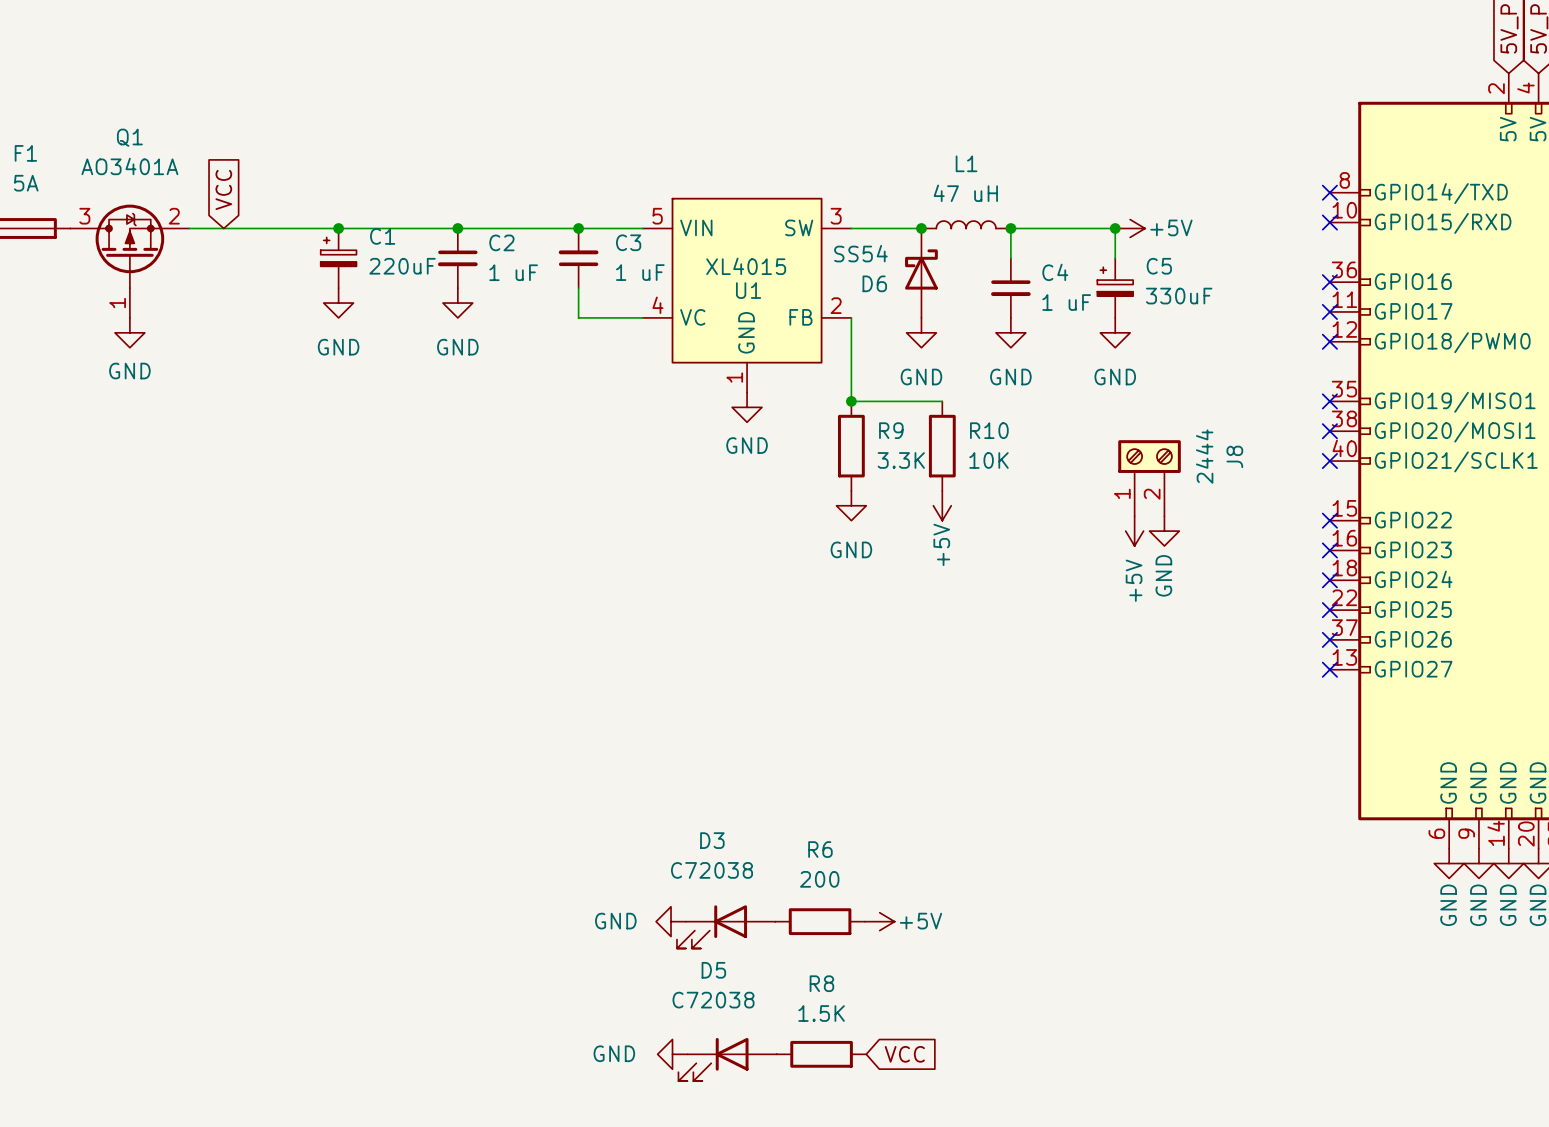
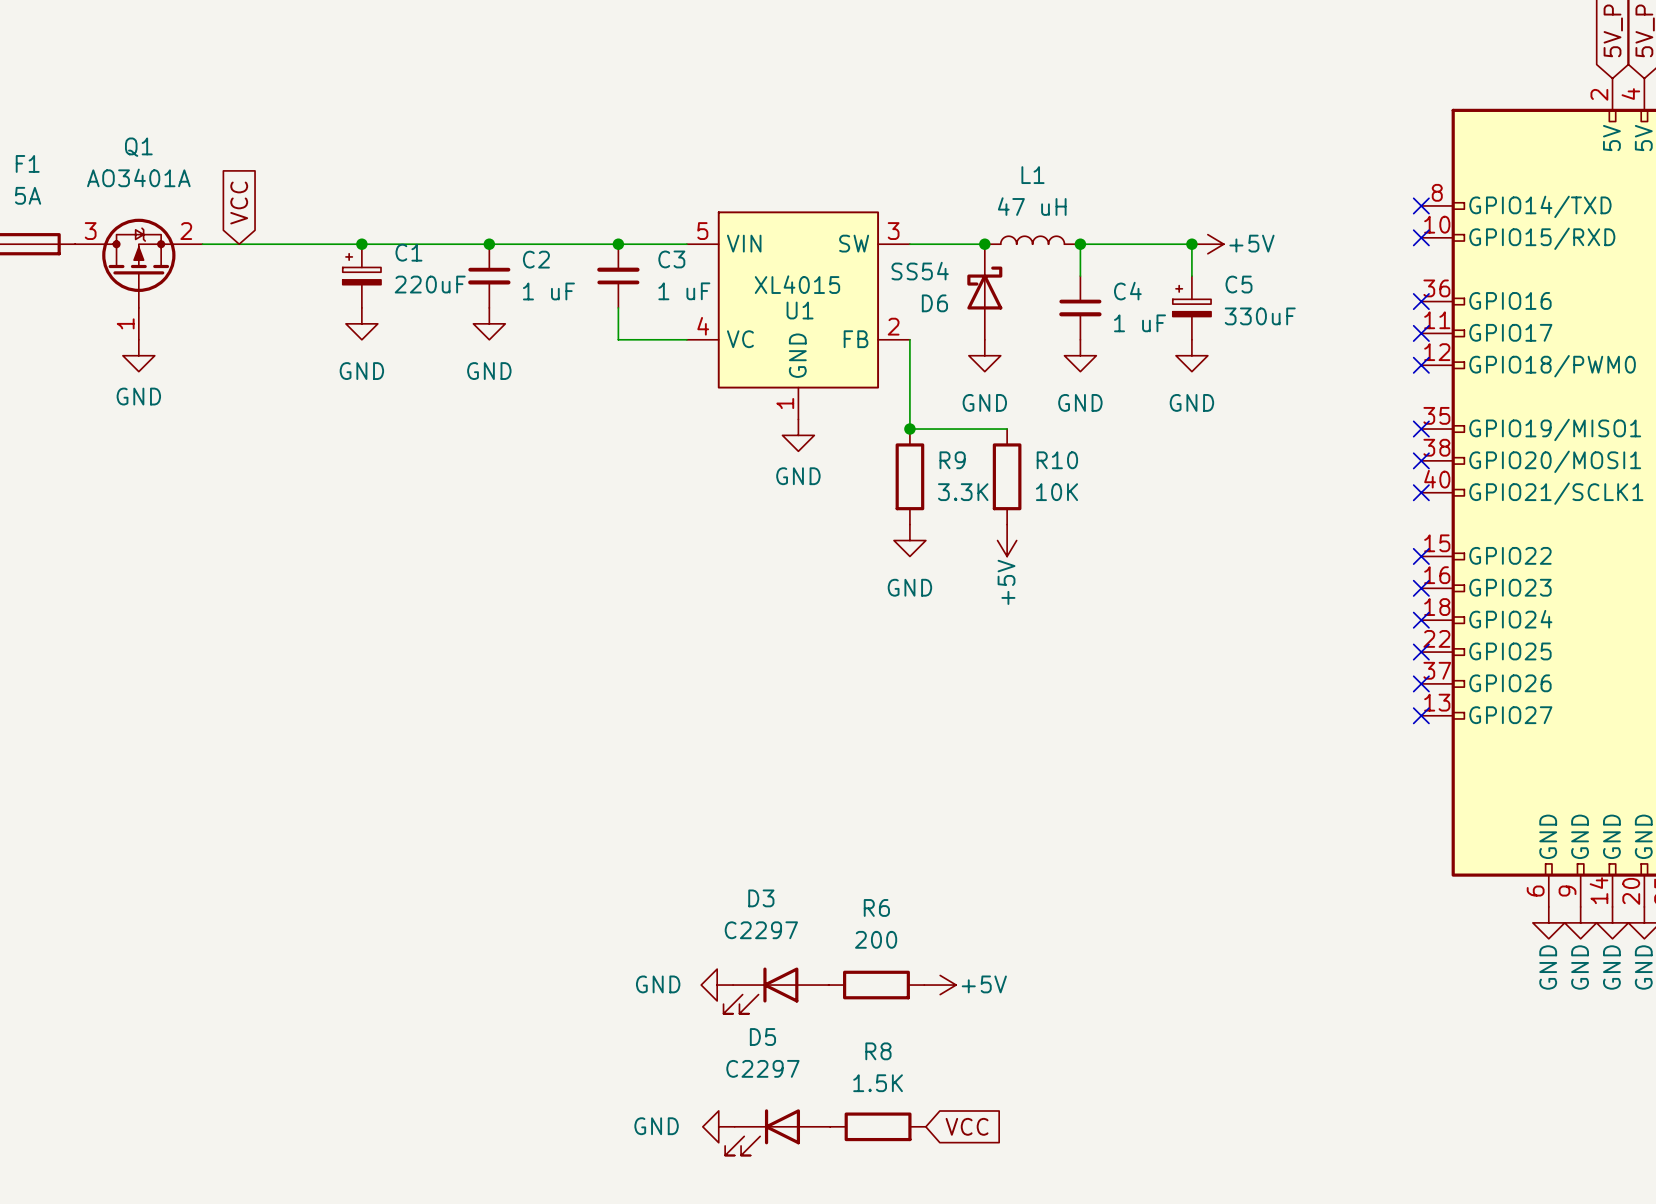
J8: 2444 (1149, 478) -> none
power symbol: +5V (1134, 531) -> none
power symbol: GND (1164, 531) -> none
D3 value: C72038 (712, 870) -> C2297 (761, 930)
D5 value: C72038 (713, 1000) -> C2297 (762, 1068)

